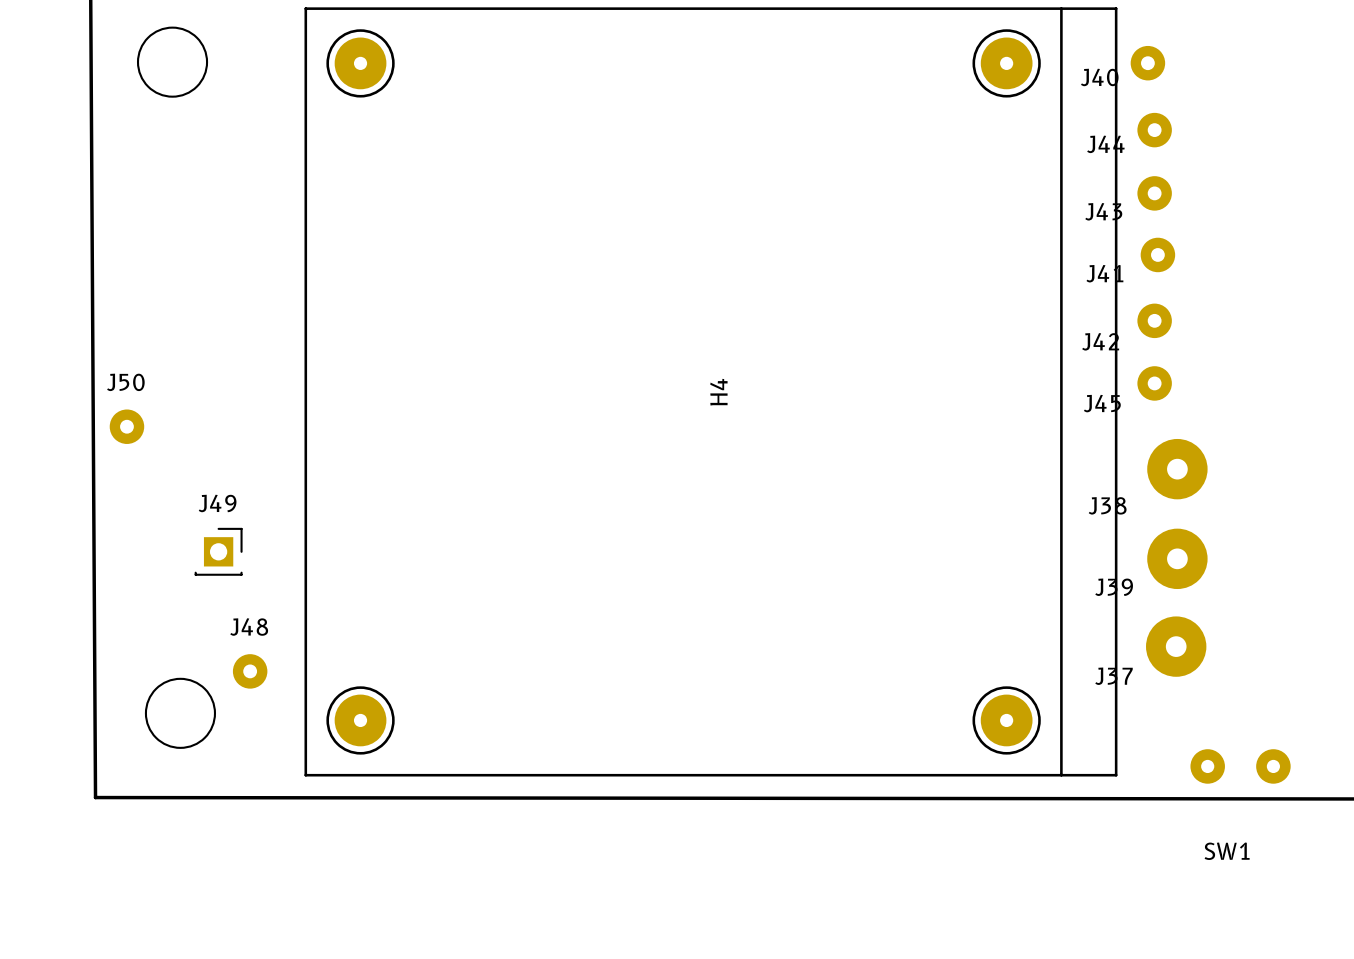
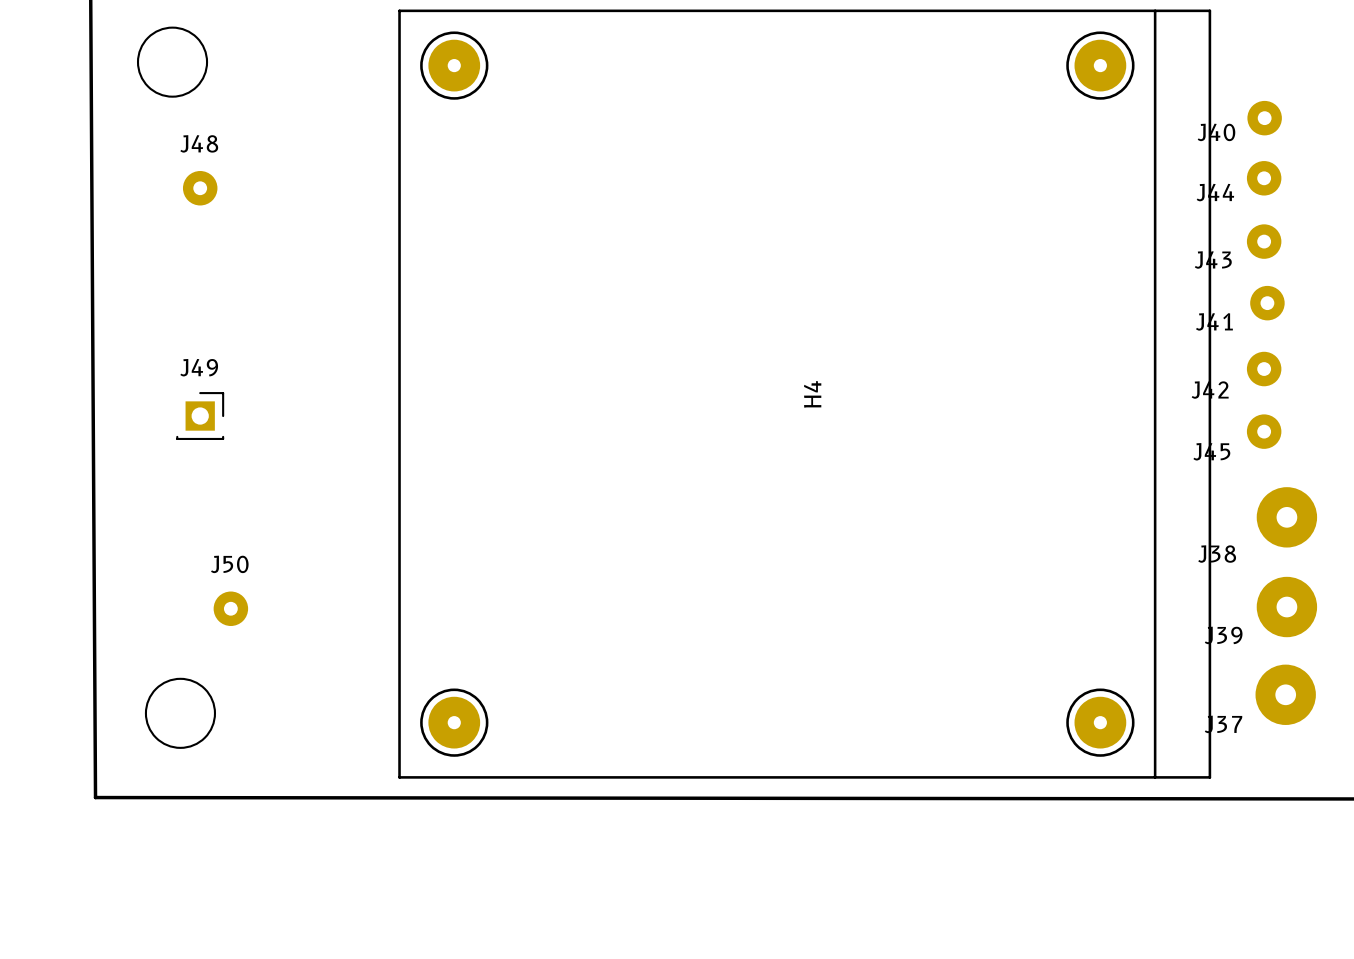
J40 position: (1147, 63) -> (1264, 118)
J44 position: (1154, 130) -> (1264, 178)
J43 position: (1154, 193) -> (1264, 241)
J41 position: (1157, 254) -> (1267, 303)
J42 position: (1154, 320) -> (1264, 369)
J45 position: (1154, 383) -> (1264, 431)
H4 position: (710, 391) -> (804, 394)
J50 position: (126, 426) -> (230, 608)
J38 position: (1177, 469) -> (1286, 517)
J49 position: (218, 551) -> (200, 416)
J39 position: (1177, 558) -> (1286, 607)
J37 position: (1176, 646) -> (1285, 694)
J48 position: (250, 671) -> (200, 188)
SW1: (1240, 766) -> none

